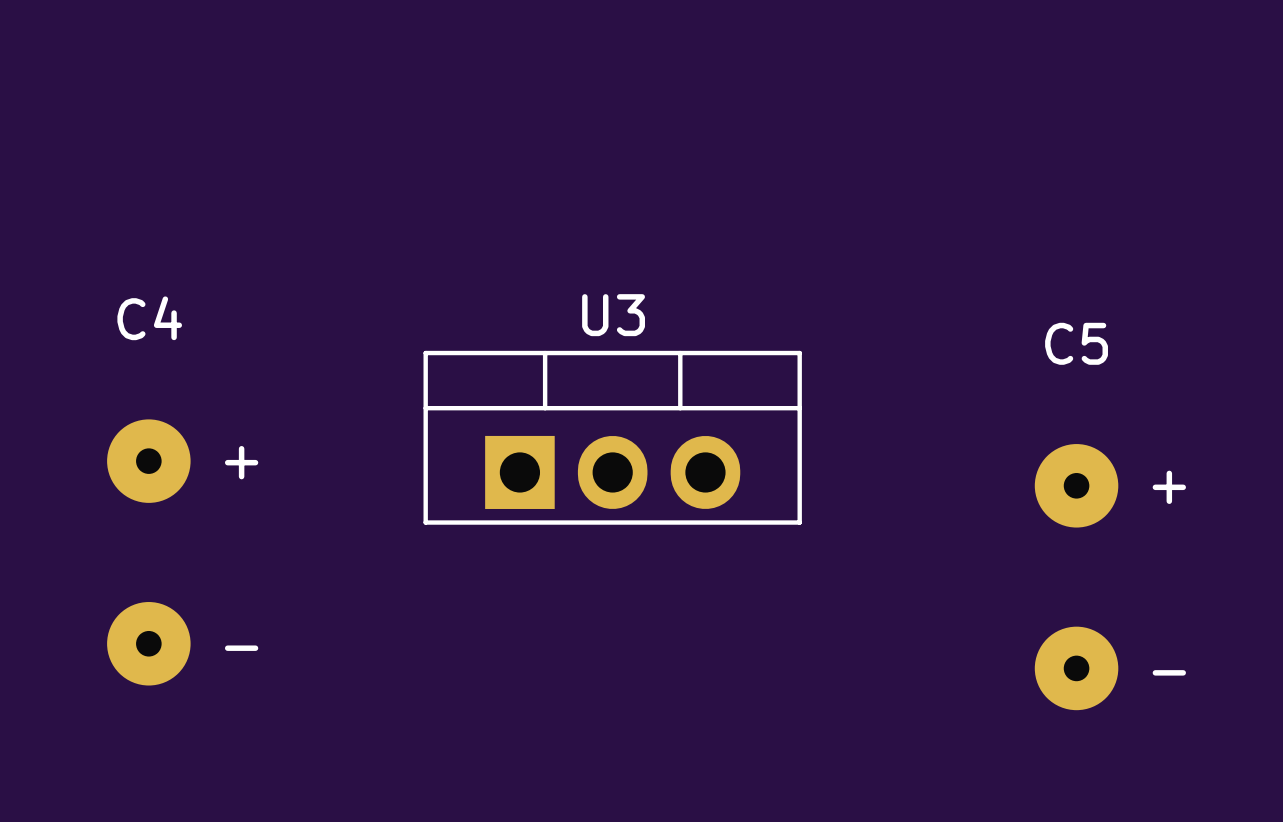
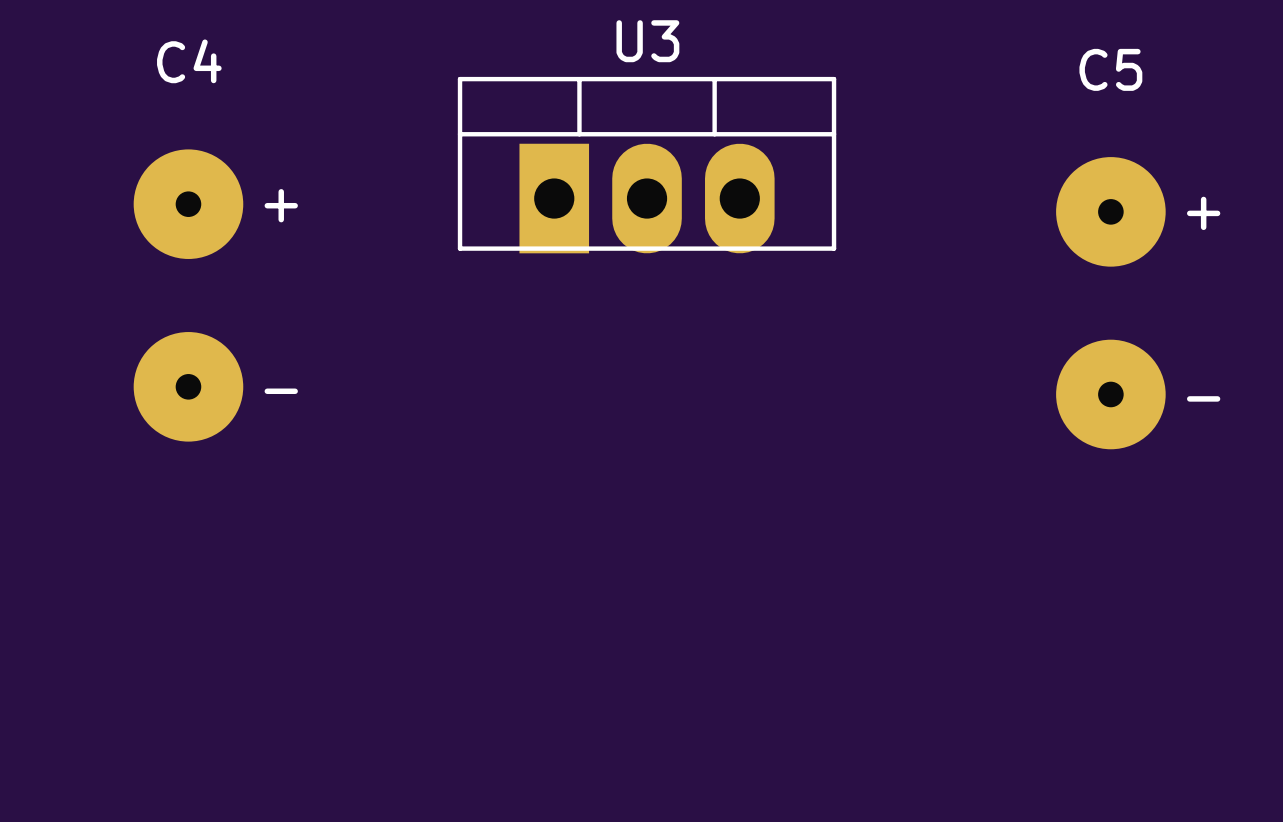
U3 footprint: [423, 350, 802, 525] -> [457, 76, 837, 254]
C4 footprint: [107, 419, 191, 686] -> [133, 149, 244, 442]
C5 footprint: [1034, 444, 1119, 711] -> [1056, 157, 1166, 450]

